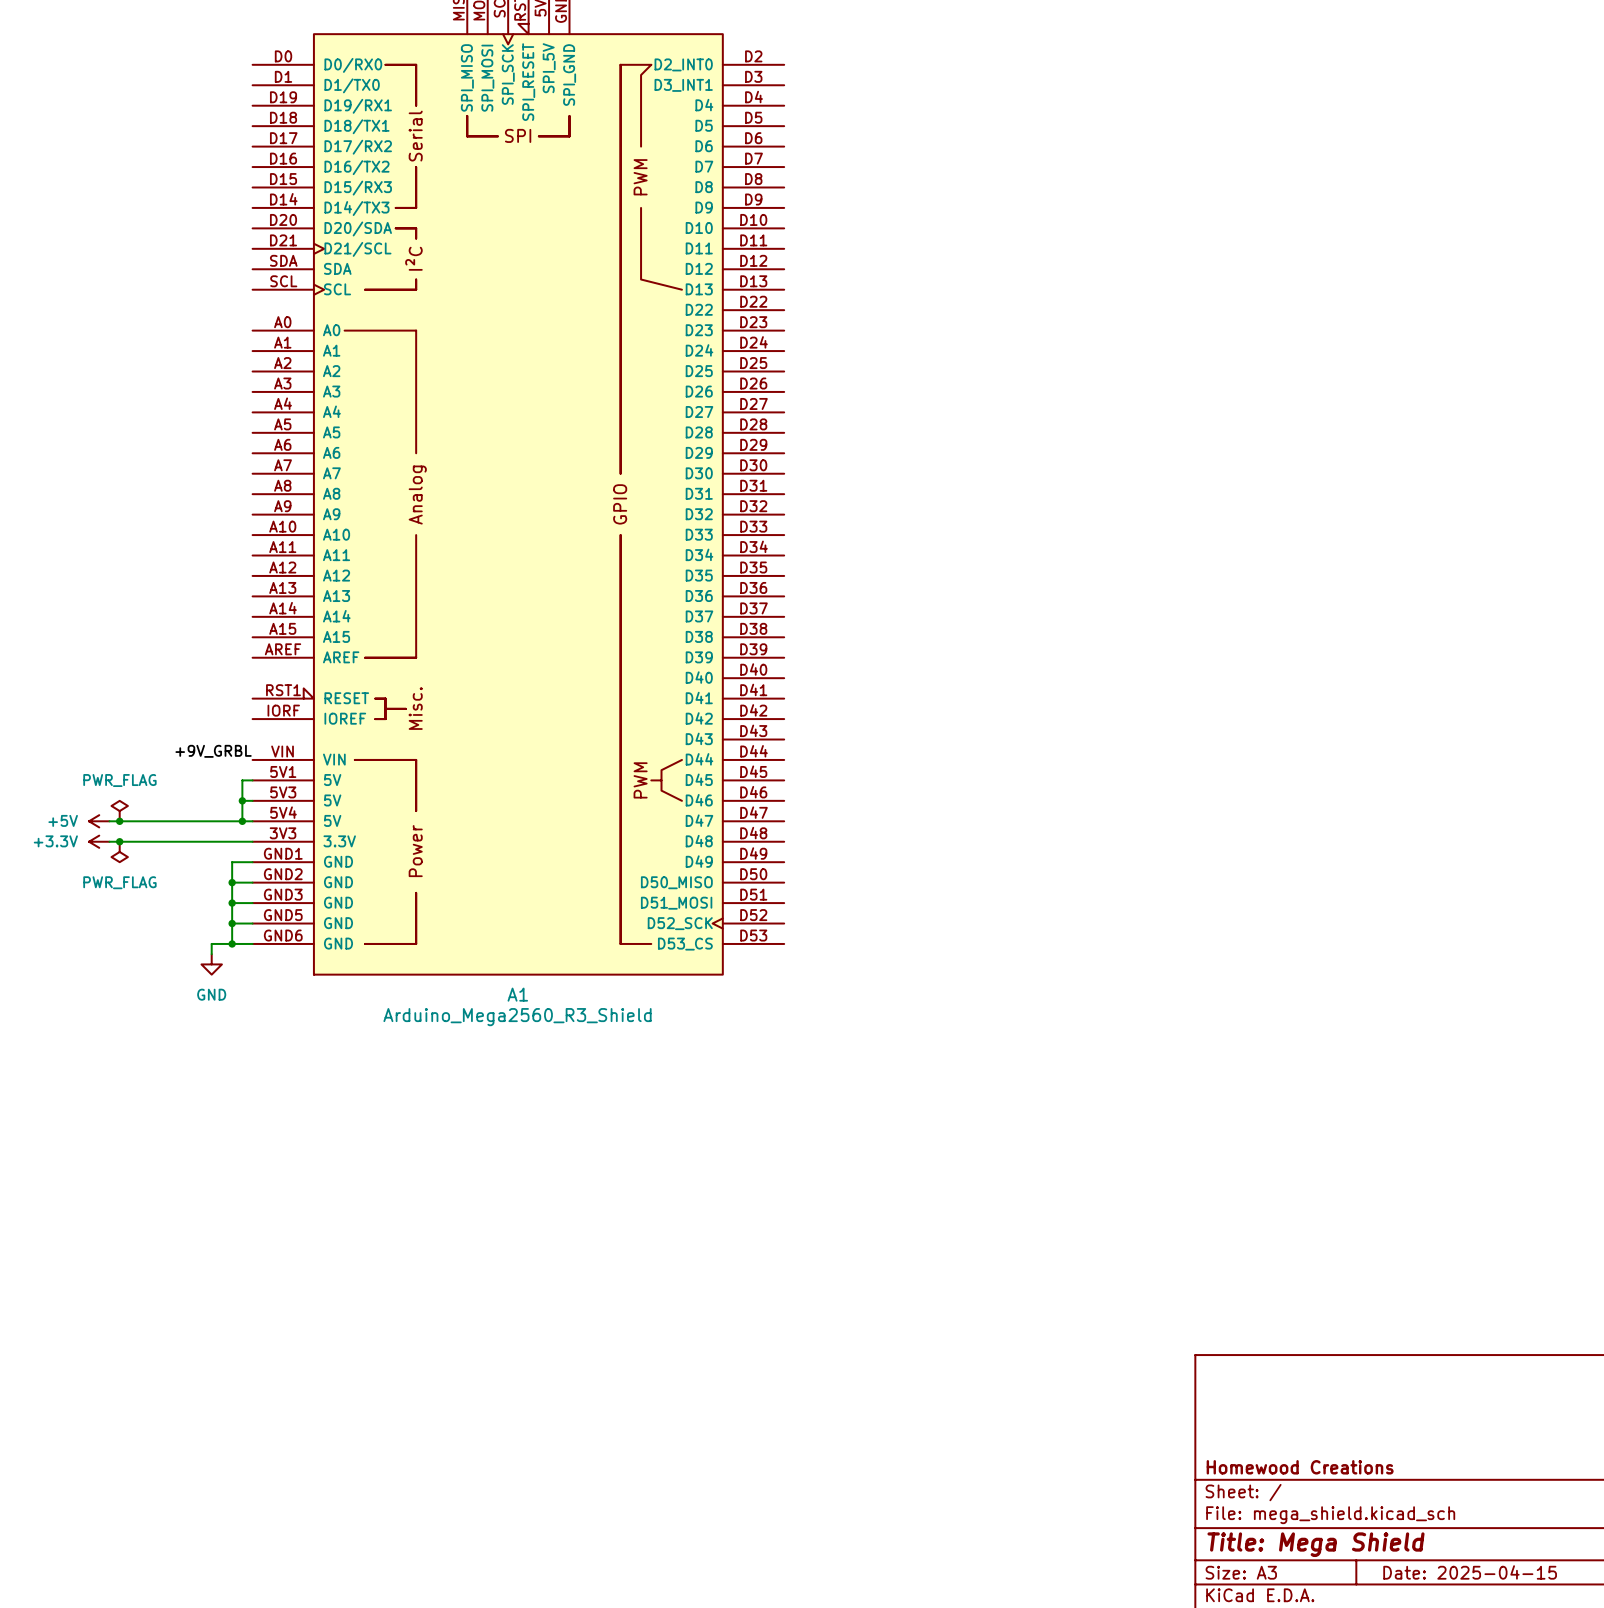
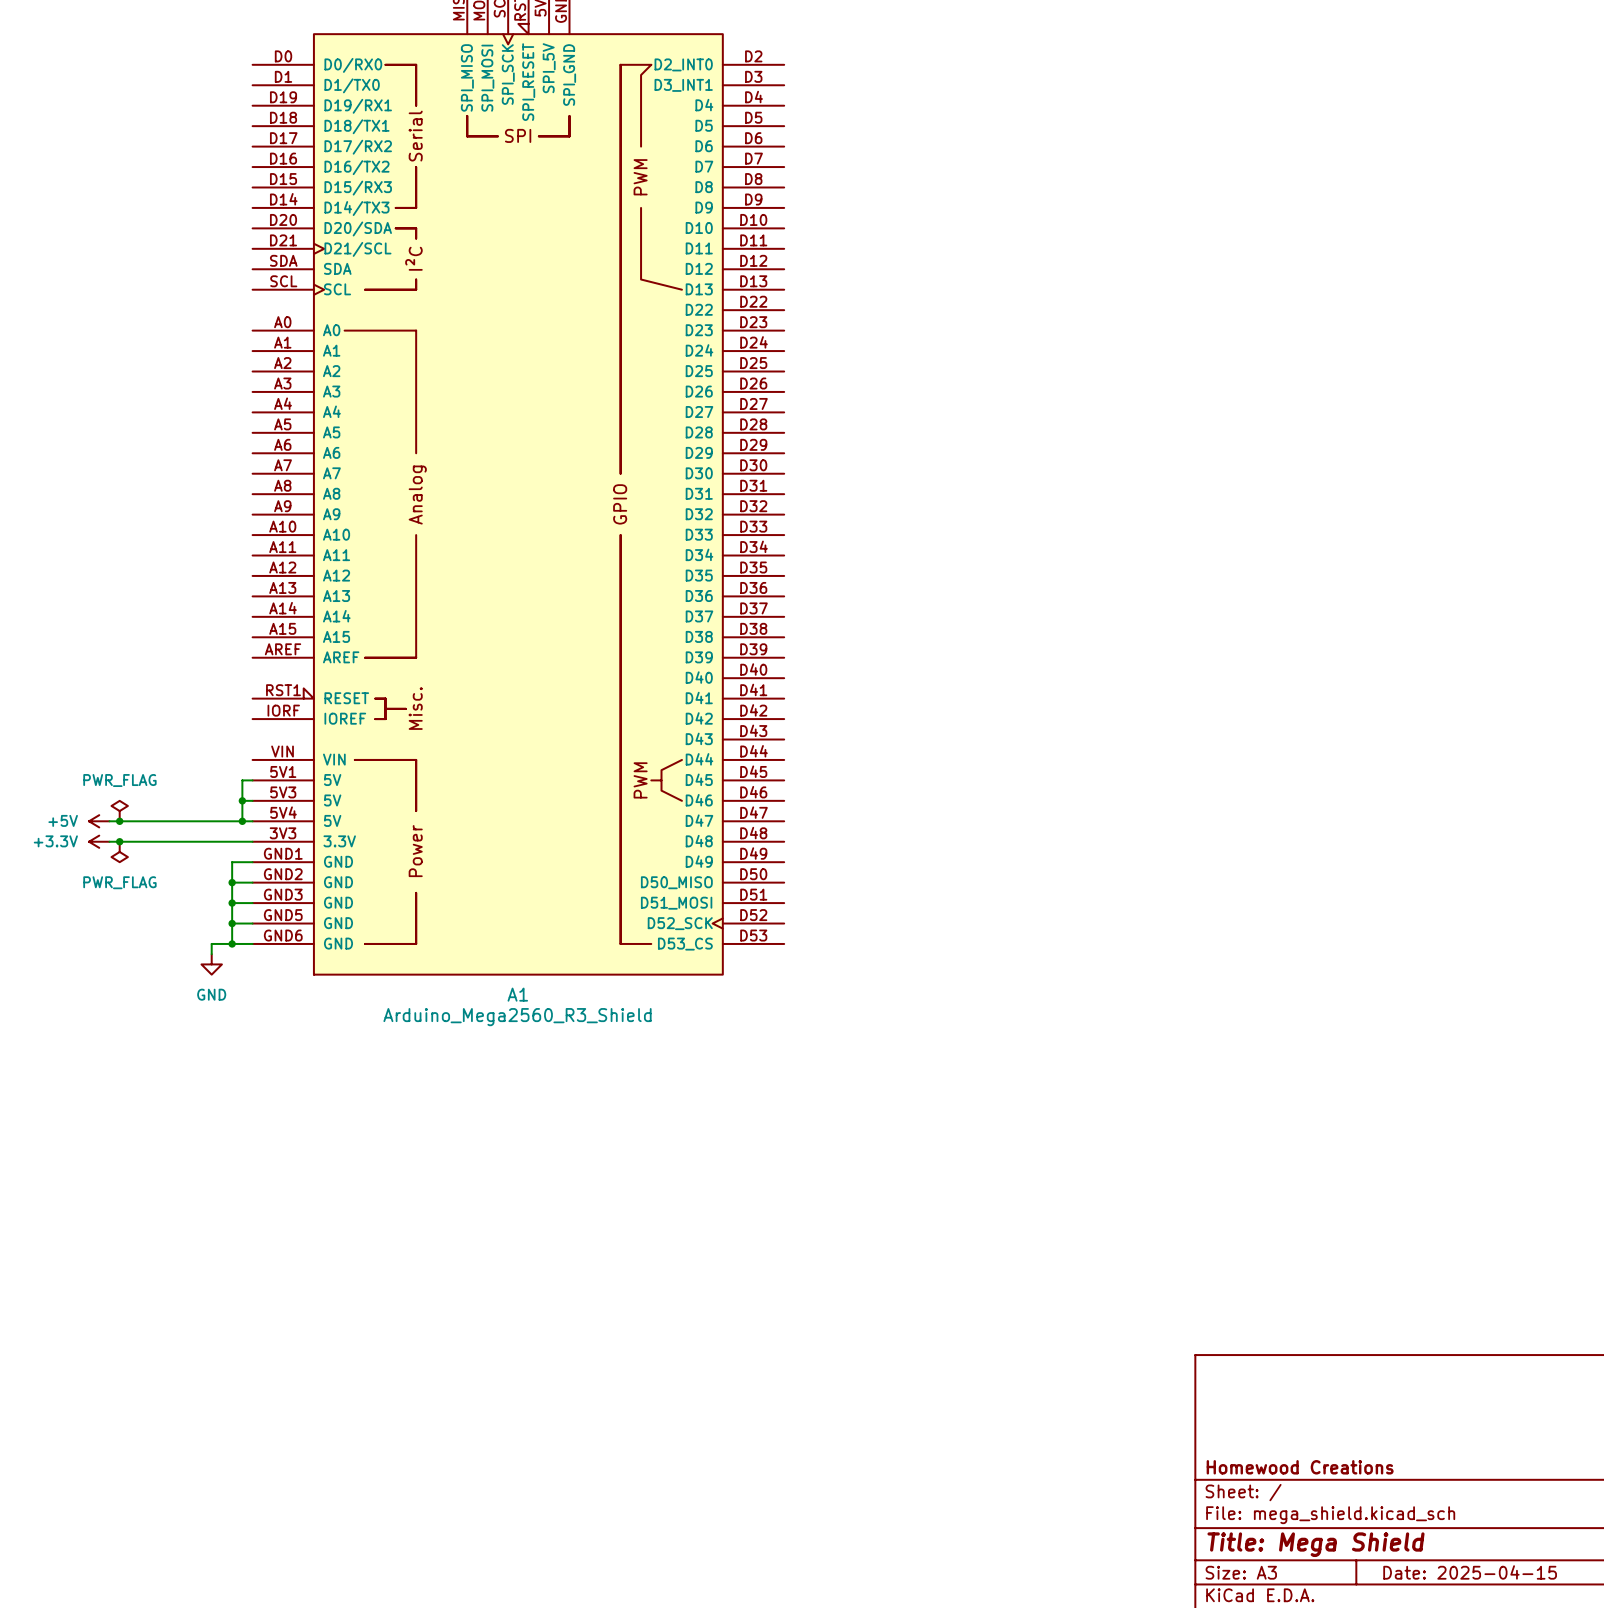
label: +9V_GRBL (213, 751) -> none

